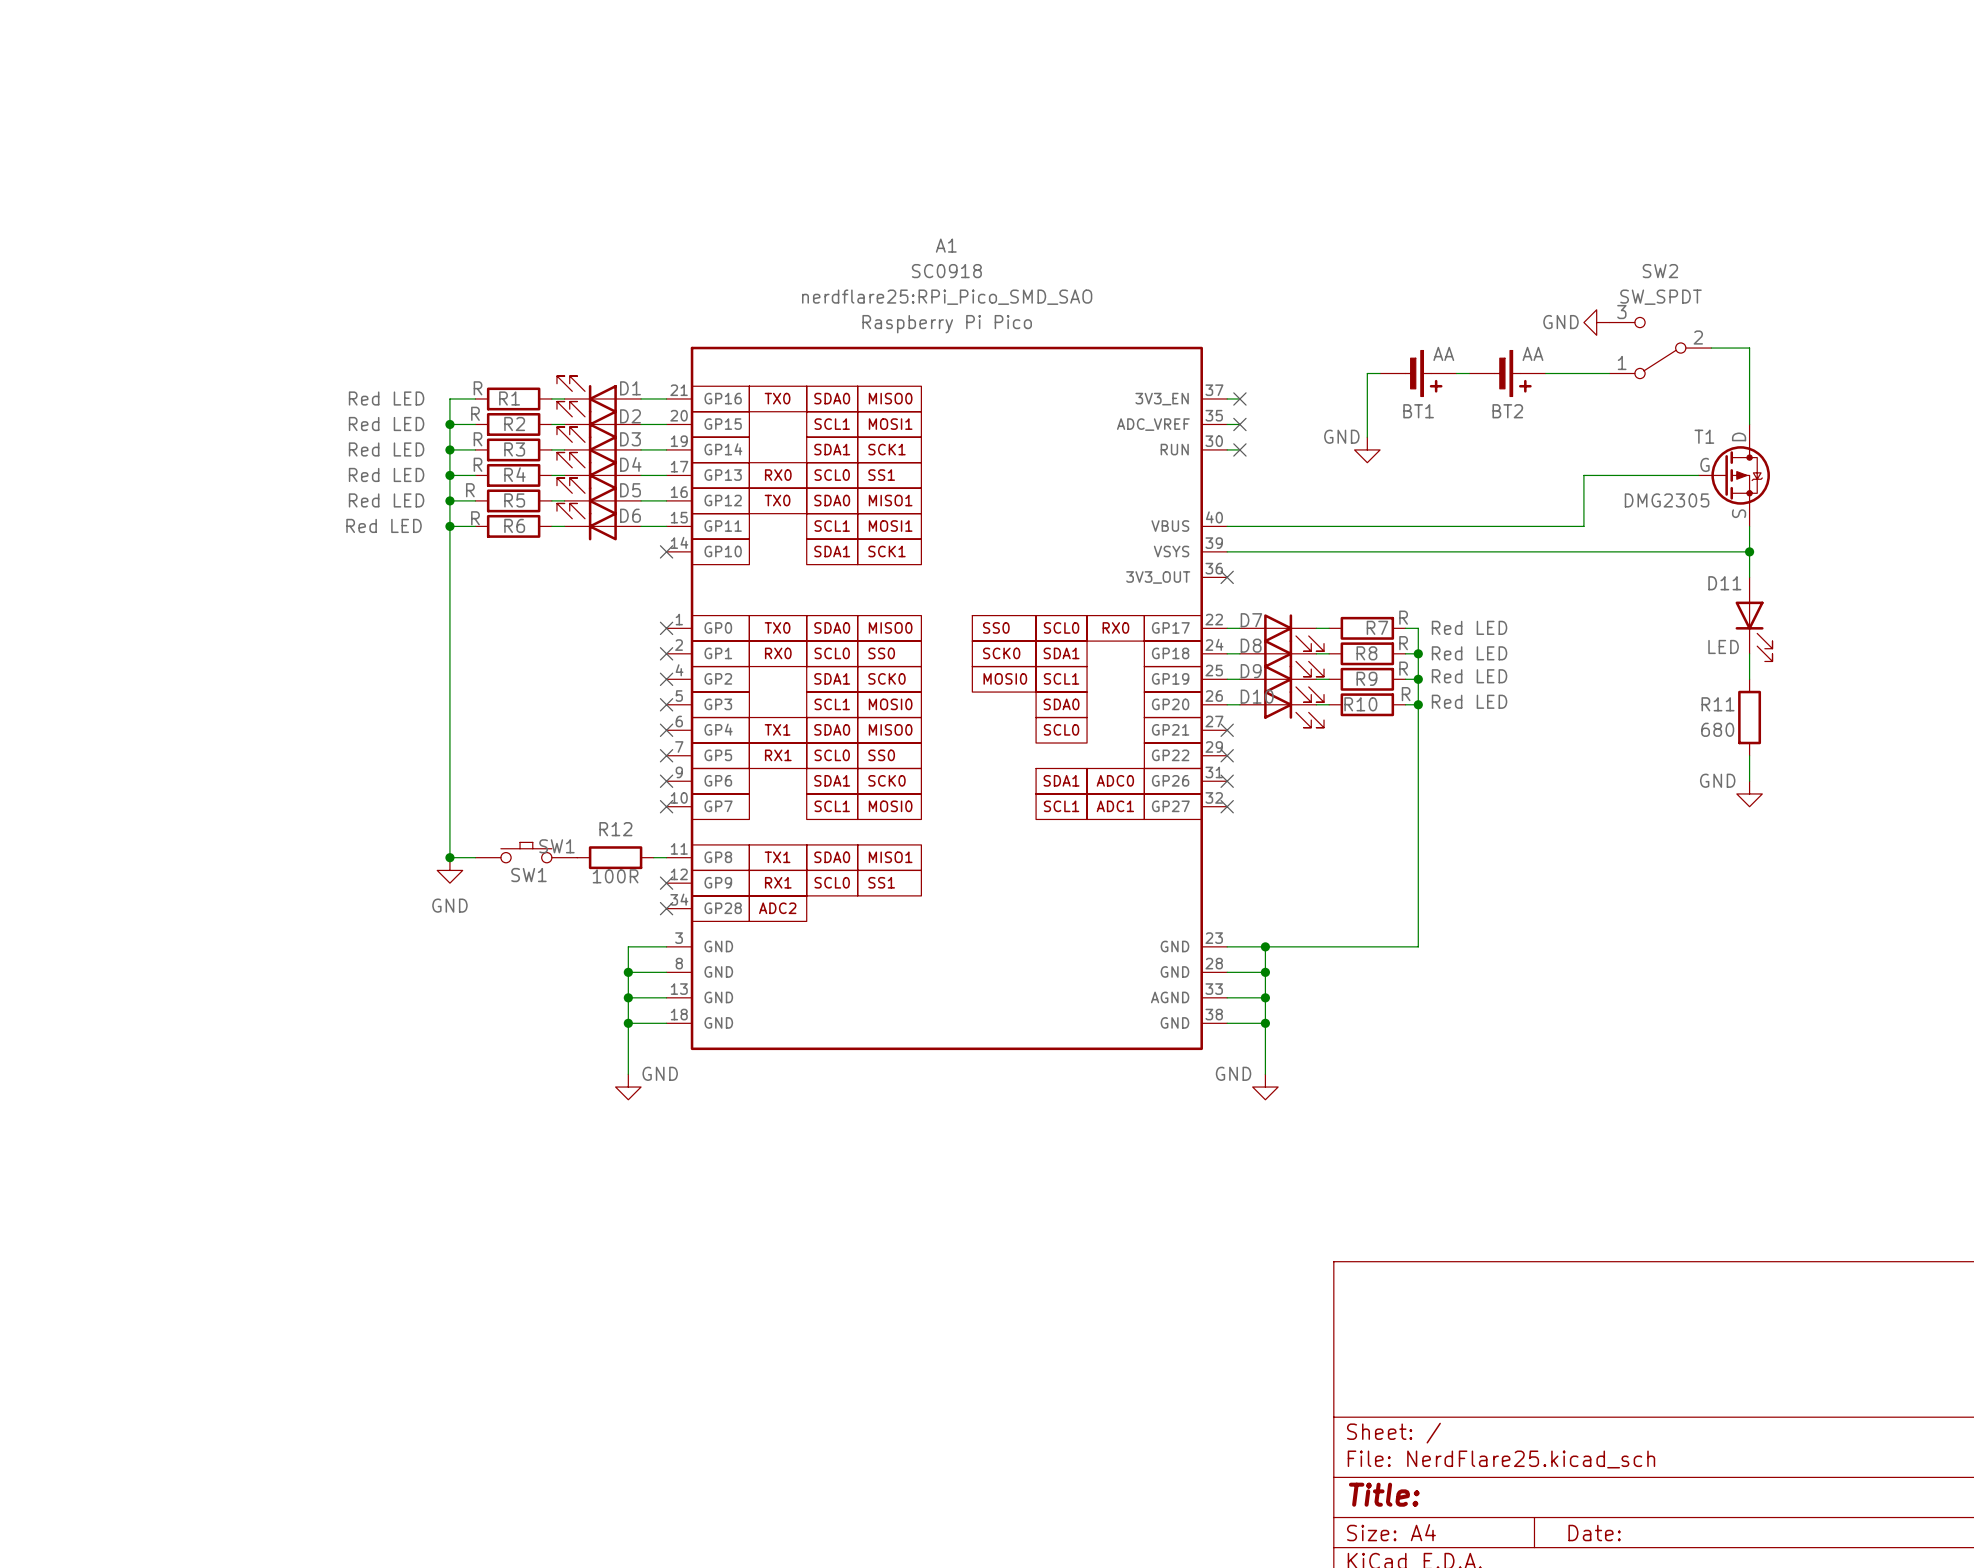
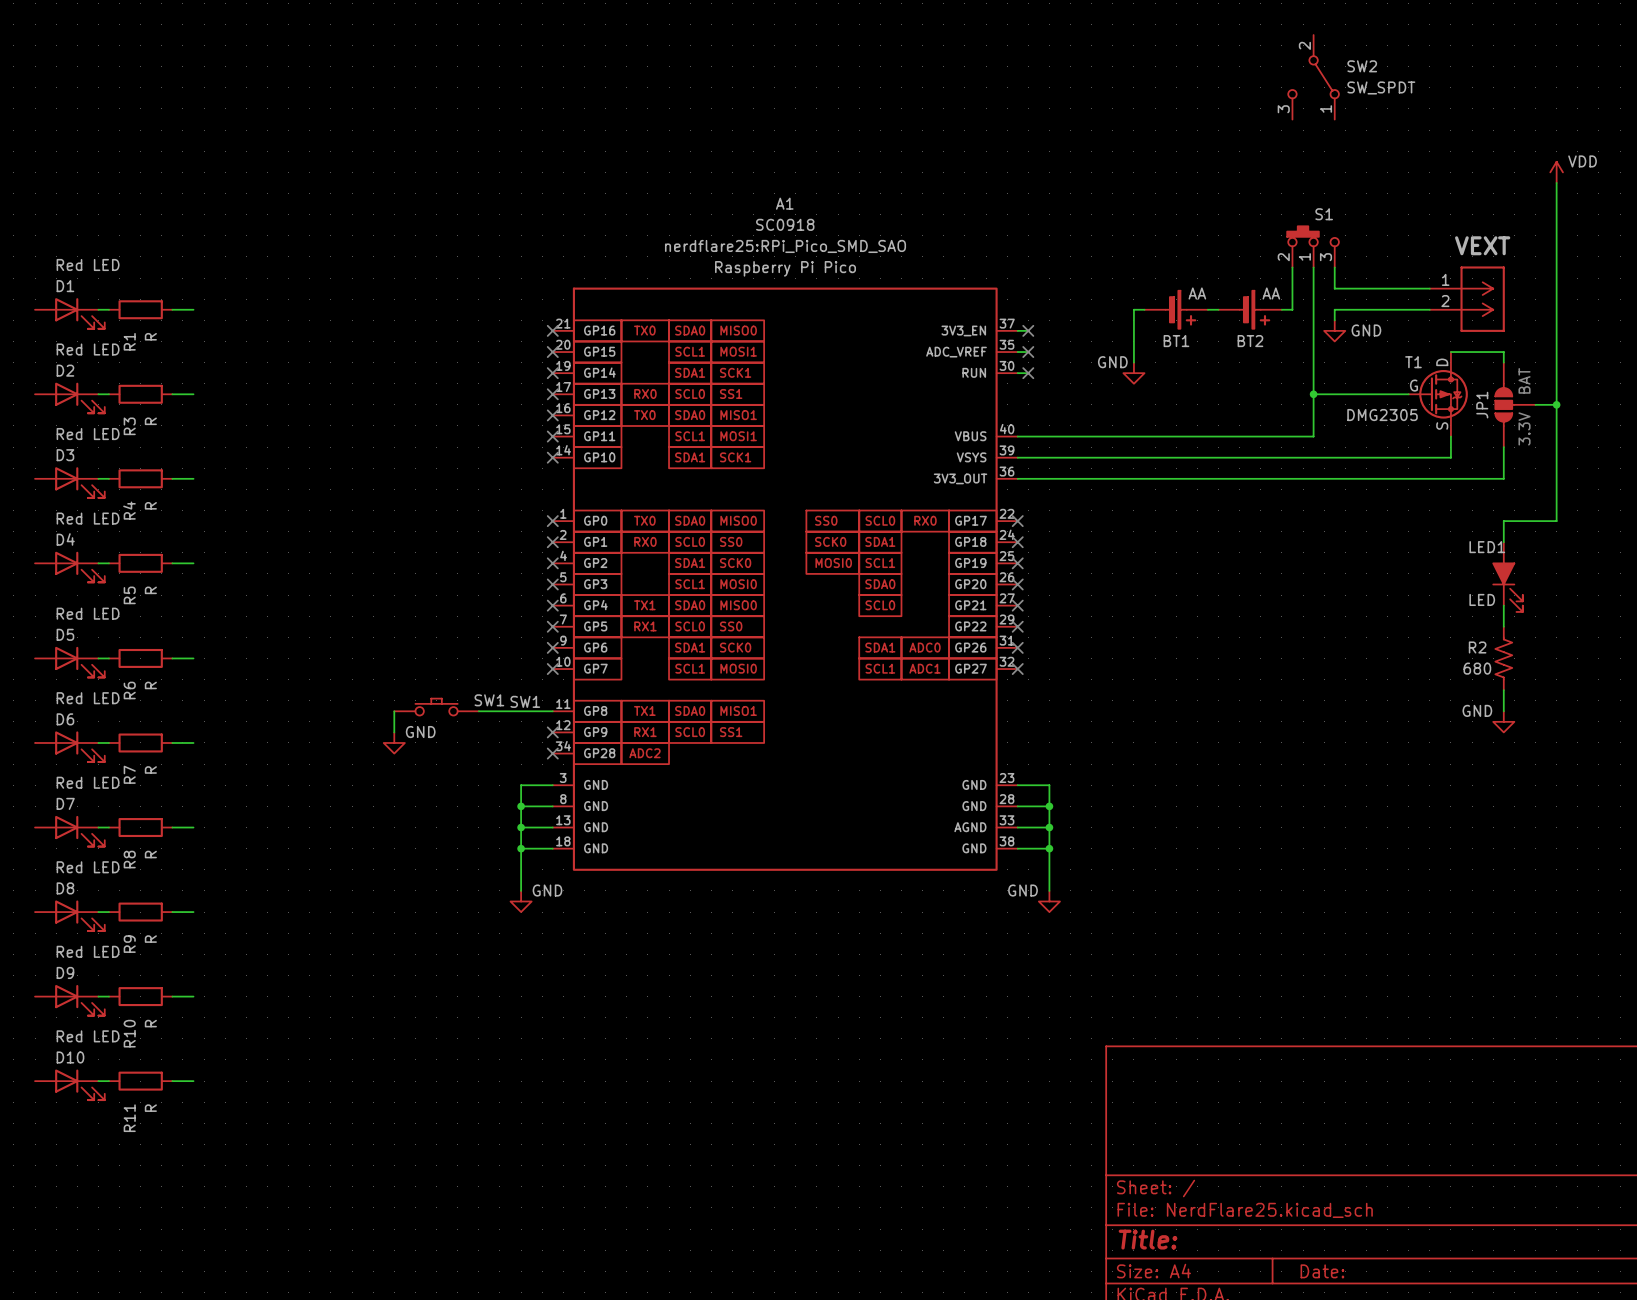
power symbol: none -> VDD (1556, 172)
wire: none -> (1556, 182) (1556, 521) (1503, 521) (1503, 542)
SW2 name position: SW2 (1660, 271) -> SW2 (1362, 66)
S1: none -> (1313, 246)
SW2 value position: SW_SPDT (1660, 297) -> SW_SPDT (1381, 87)
power symbol text position: GND (1561, 322) -> GND (1366, 330)
wire: none -> (1313, 267) (1313, 394)
power symbol rotation: 0° (1596, 322) -> 90° counterclockwise (1334, 330)
power symbol position: GND (1596, 322) -> GND (1334, 330)
wire: none -> (1334, 267) (1334, 288) (1419, 288)
SW2 rotation: 0° (1660, 348) -> 90° counterclockwise (1313, 77)
SW2 position: (1660, 348) -> (1313, 77)
wire: (1724, 348) (1749, 348) (1749, 424) -> (1503, 362) (1503, 352) (1450, 352)
part: none -> VEXT (1467, 299)
wire: none -> (98, 309) (108, 309)
wire: (1558, 373) (1609, 373) -> (1292, 309) (1292, 267)
wire: none -> (1429, 309) (1334, 309) (1334, 320)
R1 value rotation: 0° (478, 388) -> 90° counterclockwise (150, 336)
R1 value position: R (478, 388) -> R (150, 336)
D1 name position: D1 (630, 388) -> D1 (65, 286)
D1 rotation: 0° (586, 394) -> 180° (79, 313)
D1 position: (599, 394) -> (69, 313)
D1 value position: Red LED (386, 398) -> Red LED (88, 264)
wire: (475, 398) (449, 398) (449, 857) (475, 857) -> (394, 732) (394, 711)
R1 name rotation: 0° (509, 398) -> 90° counterclockwise (129, 341)
R1 name position: R1 (509, 398) -> R1 (129, 341)
R1 position: (513, 398) -> (140, 309)
wire: (551, 398) (564, 398) -> none
wire: (641, 398) (666, 398) -> none
no-connect mark: none -> (552, 330)
R2 symbol: [475, 413, 552, 436] -> [1495, 626, 1513, 691]
R2 value: R (475, 413) -> 680 (1477, 668)
D2 name position: D2 (630, 416) -> D2 (65, 370)
D2 rotation: 0° (586, 420) -> 180° (79, 397)
D2 position: (599, 420) -> (69, 397)
D2 value position: Red LED (386, 423) -> Red LED (88, 349)
R2 name position: R2 (514, 423) -> R2 (1477, 647)
wire: (449, 424) (475, 424) -> (172, 309) (193, 309)
junction: (449, 424) -> none
wire: (551, 424) (564, 424) -> none
wire: (641, 424) (666, 424) -> none
no-connect mark: none -> (552, 352)
R3 value rotation: 0° (478, 439) -> 90° counterclockwise (150, 421)
R3 value position: R (478, 439) -> R (150, 421)
D3 name position: D3 (630, 439) -> D3 (65, 455)
D3 rotation: 0° (586, 445) -> 180° (79, 482)
D3 position: (599, 445) -> (69, 482)
D3 value position: Red LED (386, 449) -> Red LED (88, 434)
wire: (449, 449) (475, 449) -> none
junction: (449, 449) -> none
R3 position: (513, 449) -> (140, 394)
R3 name rotation: 0° (514, 449) -> 90° counterclockwise (129, 426)
R3 name position: R3 (514, 449) -> R3 (129, 426)
wire: (551, 449) (564, 449) -> none
wire: (641, 449) (666, 449) -> none
no-connect mark: none -> (552, 373)
text: none -> BAT (1524, 380)
R4 value rotation: 0° (478, 464) -> 90° counterclockwise (150, 505)
R4 value position: R (478, 464) -> R (150, 505)
D4 name position: D4 (630, 464) -> D4 (65, 539)
D4 rotation: 0° (586, 470) -> 180° (79, 567)
D4 position: (599, 470) -> (69, 567)
D4 value position: Red LED (386, 474) -> Red LED (88, 518)
R4 name rotation: 0° (514, 474) -> 90° counterclockwise (129, 510)
R4 name position: R4 (514, 474) -> R4 (129, 510)
wire: none -> (98, 394) (108, 394)
wire: (449, 475) (475, 475) -> none
junction: (449, 475) -> none
R4 position: (513, 475) -> (140, 478)
wire: (551, 475) (564, 475) -> none
wire: (641, 475) (666, 475) -> none
no-connect mark: none -> (552, 394)
junction: none -> (1313, 394)
JP1: none -> (1515, 404)
wire: none -> (1535, 404) (1556, 404)
junction: none -> (1556, 404)
R5 value rotation: 0° (470, 490) -> 90° counterclockwise (150, 590)
R5 value position: R (470, 490) -> R (150, 590)
D5 name position: D5 (630, 490) -> D5 (65, 634)
D5 rotation: 0° (586, 496) -> 180° (79, 662)
D5 position: (599, 496) -> (69, 662)
D5 value position: Red LED (386, 500) -> Red LED (88, 613)
wire: (449, 500) (475, 500) -> none
junction: (449, 500) -> none
R5 position: (513, 500) -> (140, 563)
R5 name rotation: 0° (514, 500) -> 90° counterclockwise (129, 595)
R5 name position: R5 (514, 500) -> R5 (129, 595)
wire: (551, 500) (564, 500) -> none
wire: (641, 500) (666, 500) -> none
no-connect mark: none -> (552, 415)
D6 name position: D6 (630, 515) -> D6 (65, 719)
text: none -> 3.3V (1524, 428)
R6 value rotation: 0° (475, 518) -> 90° counterclockwise (150, 685)
R6 value position: R (475, 518) -> R (150, 685)
D6 rotation: 0° (586, 521) -> 180° (79, 746)
D6 position: (599, 521) -> (69, 746)
D6 value position: Red LED (384, 525) -> Red LED (88, 698)
R6 name rotation: 0° (514, 525) -> 90° counterclockwise (129, 690)
R6 name position: R6 (514, 525) -> R6 (129, 690)
wire: (449, 526) (475, 526) -> (172, 394) (193, 394)
junction: (449, 526) -> none
R6 position: (513, 526) -> (140, 658)
wire: (551, 526) (564, 526) -> none
wire: (641, 526) (666, 526) -> none
no-connect mark: none -> (552, 436)
wire: none -> (1503, 447) (1503, 478) (1017, 478)
wire: (1749, 551) (1749, 577) -> none
junction: (1749, 551) -> none
wire: none -> (98, 478) (108, 478)
wire: none -> (172, 478) (193, 478)
no-connect mark: (1227, 577) -> none
R7 value rotation: 0° (1403, 617) -> 90° counterclockwise (150, 769)
R7 value position: R (1403, 617) -> R (150, 769)
D11: LED (1754, 619) -> none
D7 name position: D7 (1251, 620) -> D7 (65, 803)
R7 name rotation: 0° (1377, 627) -> 90° counterclockwise (129, 774)
R7 name position: R7 (1377, 627) -> R7 (129, 774)
D7 value position: Red LED (1469, 627) -> Red LED (88, 782)
wire: (1227, 628) (1239, 628) -> none
no-connect mark: none -> (1017, 521)
wire: (1316, 628) (1329, 628) -> none
R7 position: (1367, 628) -> (140, 742)
wire: (1405, 628) (1418, 628) (1418, 946) (1265, 946) -> none
D7 position: (1281, 632) -> (69, 831)
R8 value rotation: 0° (1403, 643) -> 90° counterclockwise (150, 854)
R8 value position: R (1403, 643) -> R (150, 854)
D8 name position: D8 (1251, 645) -> D8 (65, 888)
wire: (1227, 653) (1239, 653) -> none
no-connect mark: none -> (1017, 542)
wire: (1316, 653) (1329, 653) -> none
R8 name rotation: 0° (1366, 653) -> 90° counterclockwise (129, 859)
R8 name position: R8 (1366, 653) -> R8 (129, 859)
R8 position: (1367, 653) -> (140, 827)
wire: (1405, 653) (1418, 653) -> none
junction: (1418, 653) -> none
D8 value position: Red LED (1469, 653) -> Red LED (88, 867)
wire: (1749, 653) (1749, 679) -> (1503, 605) (1503, 626)
D8 position: (1281, 658) -> (69, 915)
R9 value rotation: 0° (1403, 668) -> 90° counterclockwise (150, 939)
R9 value position: R (1403, 668) -> R (150, 939)
D9 name position: D9 (1251, 671) -> D9 (65, 972)
D9 value position: Red LED (1469, 676) -> Red LED (88, 951)
R9 name rotation: 0° (1366, 678) -> 90° counterclockwise (129, 944)
R9 name position: R9 (1366, 678) -> R9 (129, 944)
wire: none -> (98, 563) (108, 563)
wire: none -> (172, 563) (193, 563)
wire: (1227, 679) (1239, 679) -> none
no-connect mark: none -> (1017, 563)
wire: (1316, 679) (1329, 679) -> none
R9 position: (1367, 679) -> (140, 912)
wire: (1405, 679) (1418, 679) -> none
junction: (1418, 679) -> none
D9 position: (1281, 683) -> (69, 1000)
R10 value rotation: 0° (1406, 694) -> 90° counterclockwise (150, 1023)
R10 value position: R (1406, 694) -> R (150, 1023)
LED1: none -> LED (1507, 577)
D10 name position: D10 (1257, 696) -> D10 (70, 1057)
D10 value position: Red LED (1469, 701) -> Red LED (88, 1036)
wire: (1227, 704) (1239, 704) -> none
no-connect mark: none -> (1017, 584)
wire: (1316, 704) (1329, 704) -> none
R10 name rotation: 0° (1360, 704) -> 90° counterclockwise (129, 1033)
R10 name position: R10 (1360, 704) -> R10 (129, 1033)
R10 position: (1367, 704) -> (140, 996)
wire: (1405, 704) (1418, 704) -> none
junction: (1418, 704) -> none
R11 name position: R11 (1718, 704) -> R11 (129, 1118)
D10 position: (1281, 709) -> (69, 1084)
R11 rotation: 0° (1749, 717) -> 90° clockwise (140, 1081)
R11 position: (1749, 717) -> (140, 1081)
R11 value: 680 (1717, 729) -> R (150, 1108)
wire: (1749, 755) (1749, 781) -> (1503, 690) (1503, 711)
wire: none -> (98, 658) (108, 658)
wire: none -> (172, 658) (193, 658)
power symbol position: GND (1749, 793) -> GND (1503, 721)
label position: SW1 (556, 846) -> SW1 (525, 701)
junction: (449, 857) -> none
wire: none -> (478, 711) (542, 711)
R12: 100R (615, 857) -> none
power symbol position: GND (449, 870) -> GND (394, 742)
SW1 name position: SW1 (528, 875) -> SW1 (489, 700)
wire: none -> (98, 742) (108, 742)
wire: none -> (172, 742) (193, 742)
power symbol text position: GND (449, 905) -> GND (420, 732)
junction: (1265, 946) -> none
wire: none -> (98, 827) (108, 827)
wire: none -> (172, 827) (193, 827)
wire: none -> (98, 912) (108, 912)
wire: none -> (172, 912) (193, 912)
wire: none -> (98, 996) (108, 996)
wire: none -> (172, 996) (193, 996)
wire: none -> (98, 1081) (108, 1081)
wire: none -> (172, 1081) (193, 1081)

